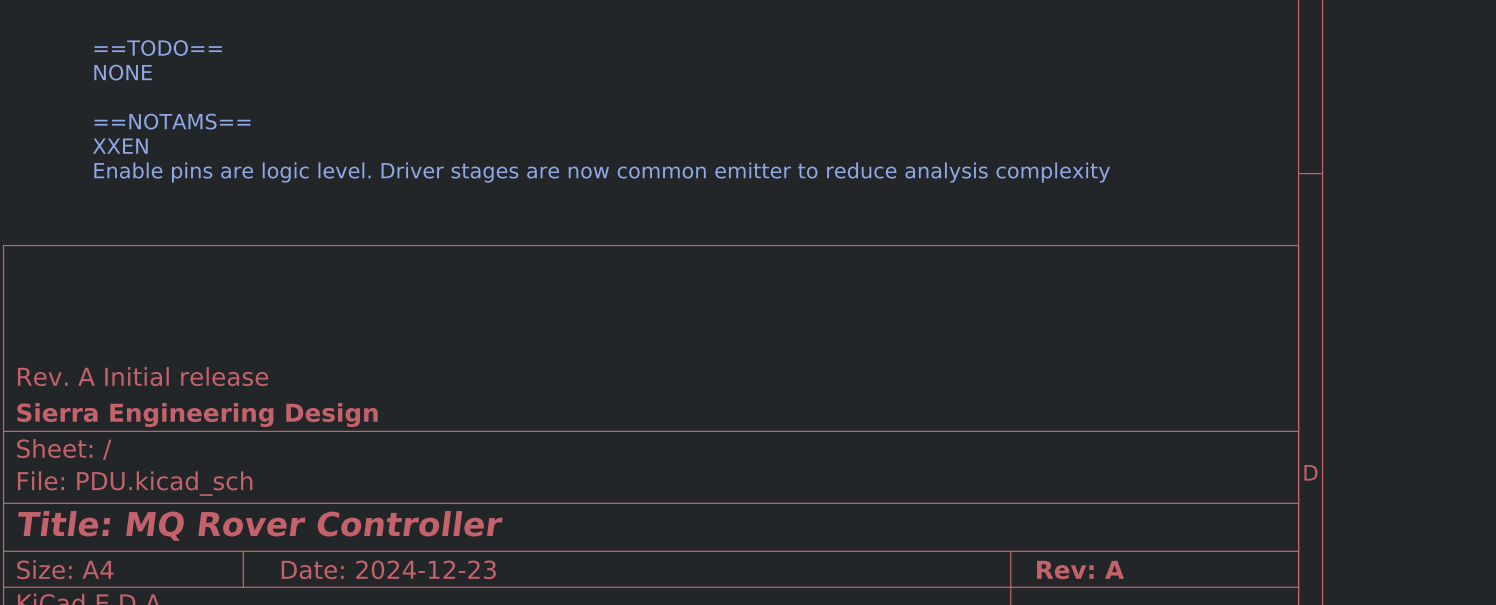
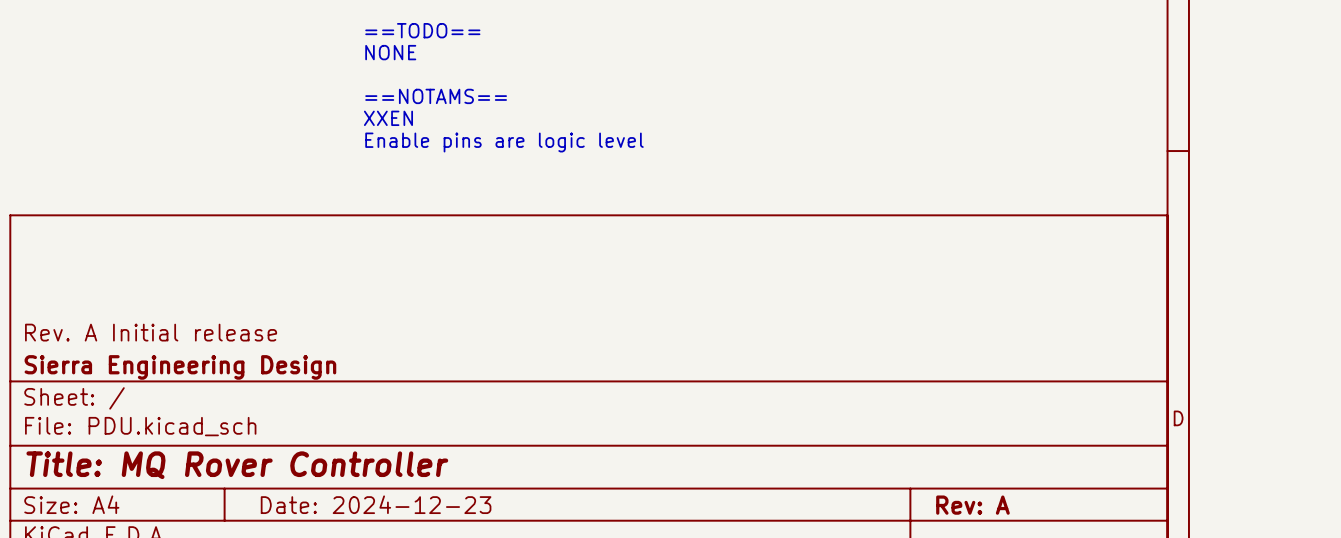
text: none -> ==TODO== (422, 30)
text: ==TODO== (158, 48) -> none
text: none -> NONE (390, 52)
text: NONE (123, 72) -> none
text: none -> ==NOTAMS== (436, 96)
text: ==NOTAMS== (172, 121) -> none
text: none -> XXEN (388, 118)
text: XXEN (120, 146) -> none
text: none -> Enable pins are logic level (504, 142)
text: Enable pins are logic level. Driver stages are now common emitter to reduce analysis complexity (602, 172) -> none

